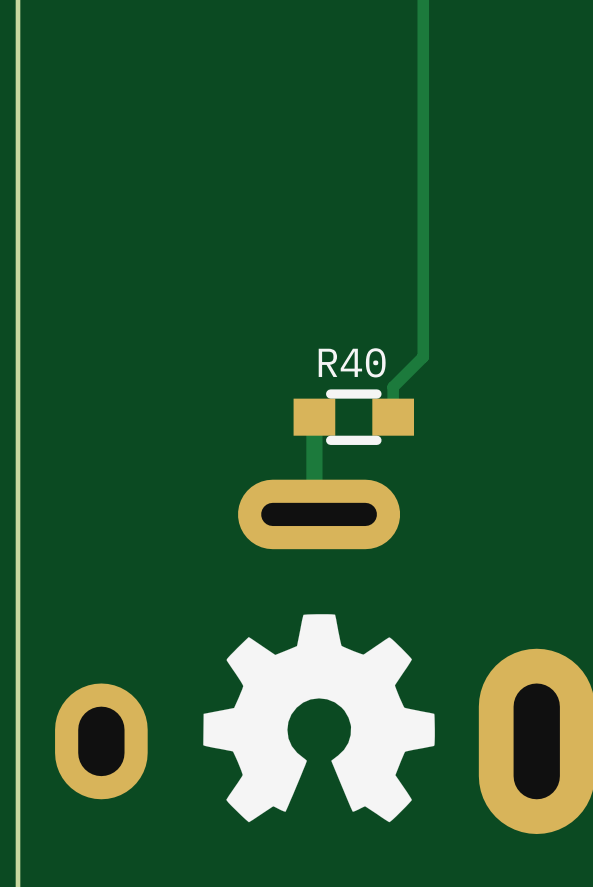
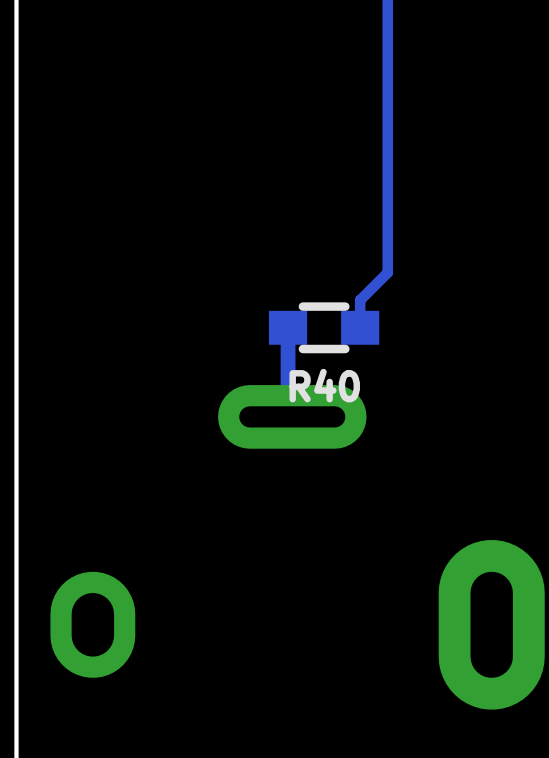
R40 name position: R40 (352, 362) -> R40 (324, 385)
drawing: [203, 614, 435, 823] -> none

